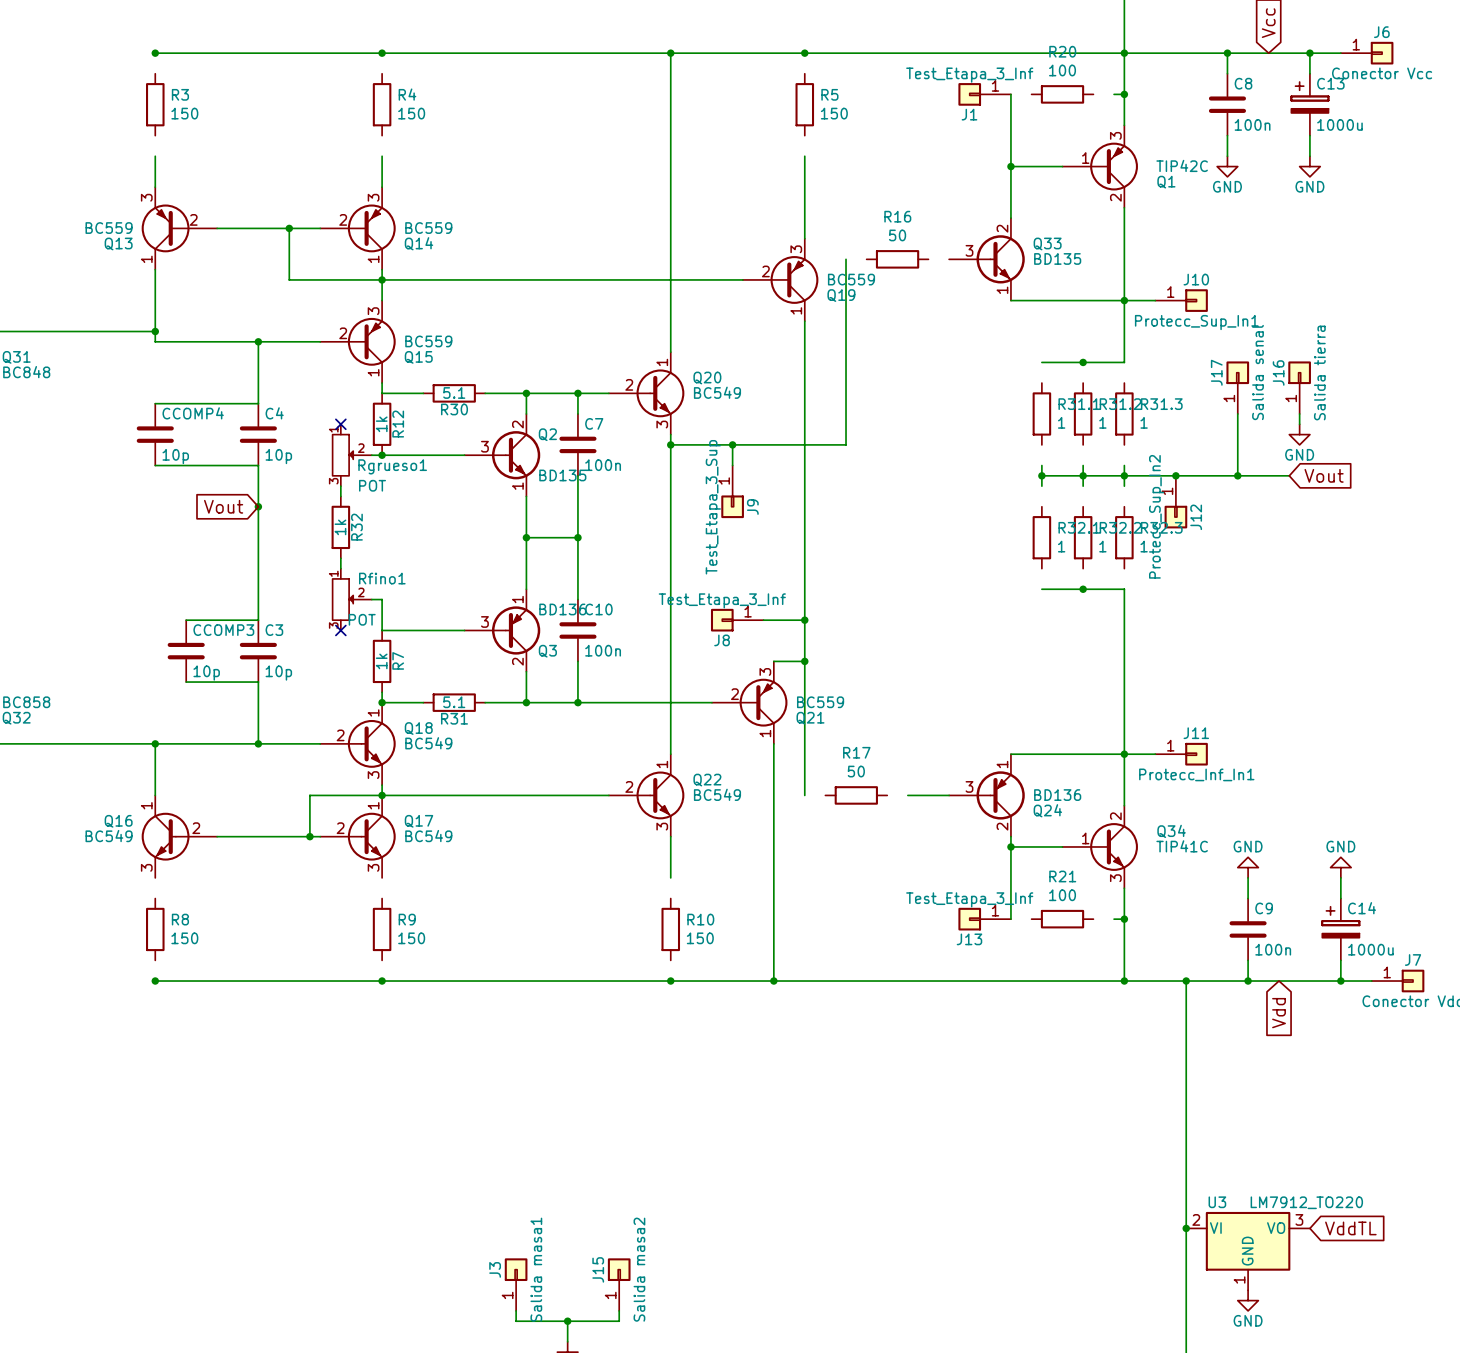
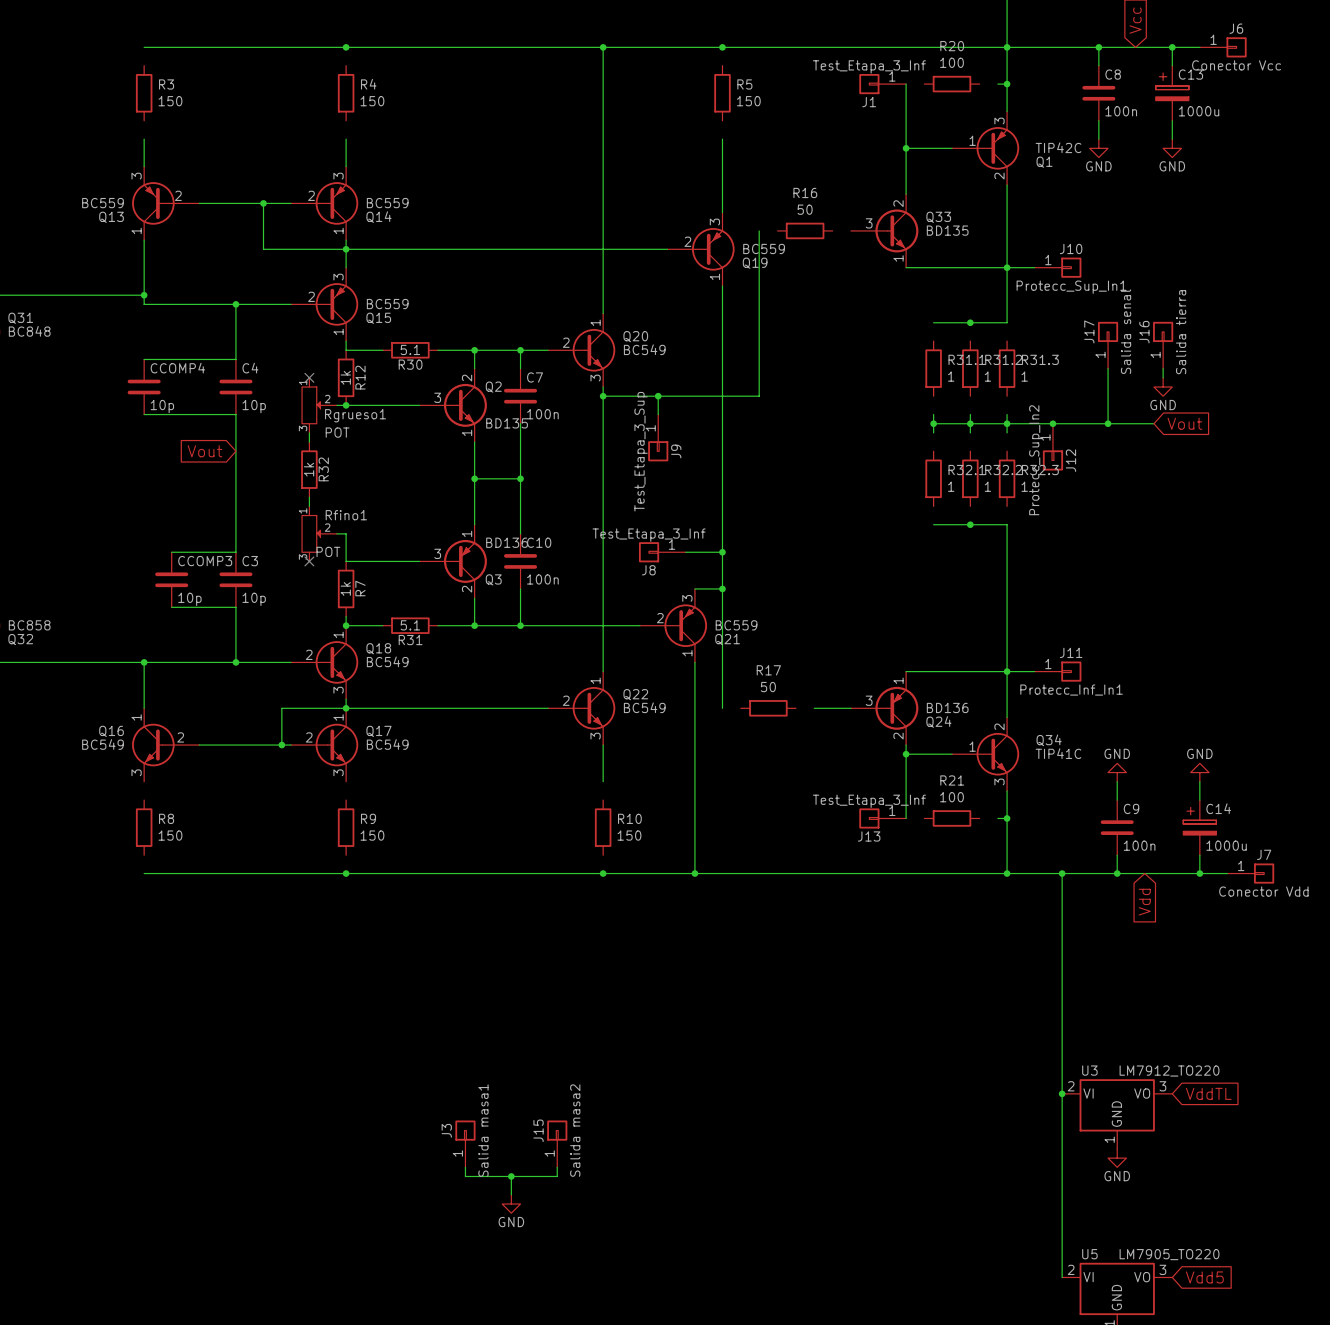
junction: (155, 53) -> none
junction: (258, 506) -> none
junction: (155, 981) -> none

